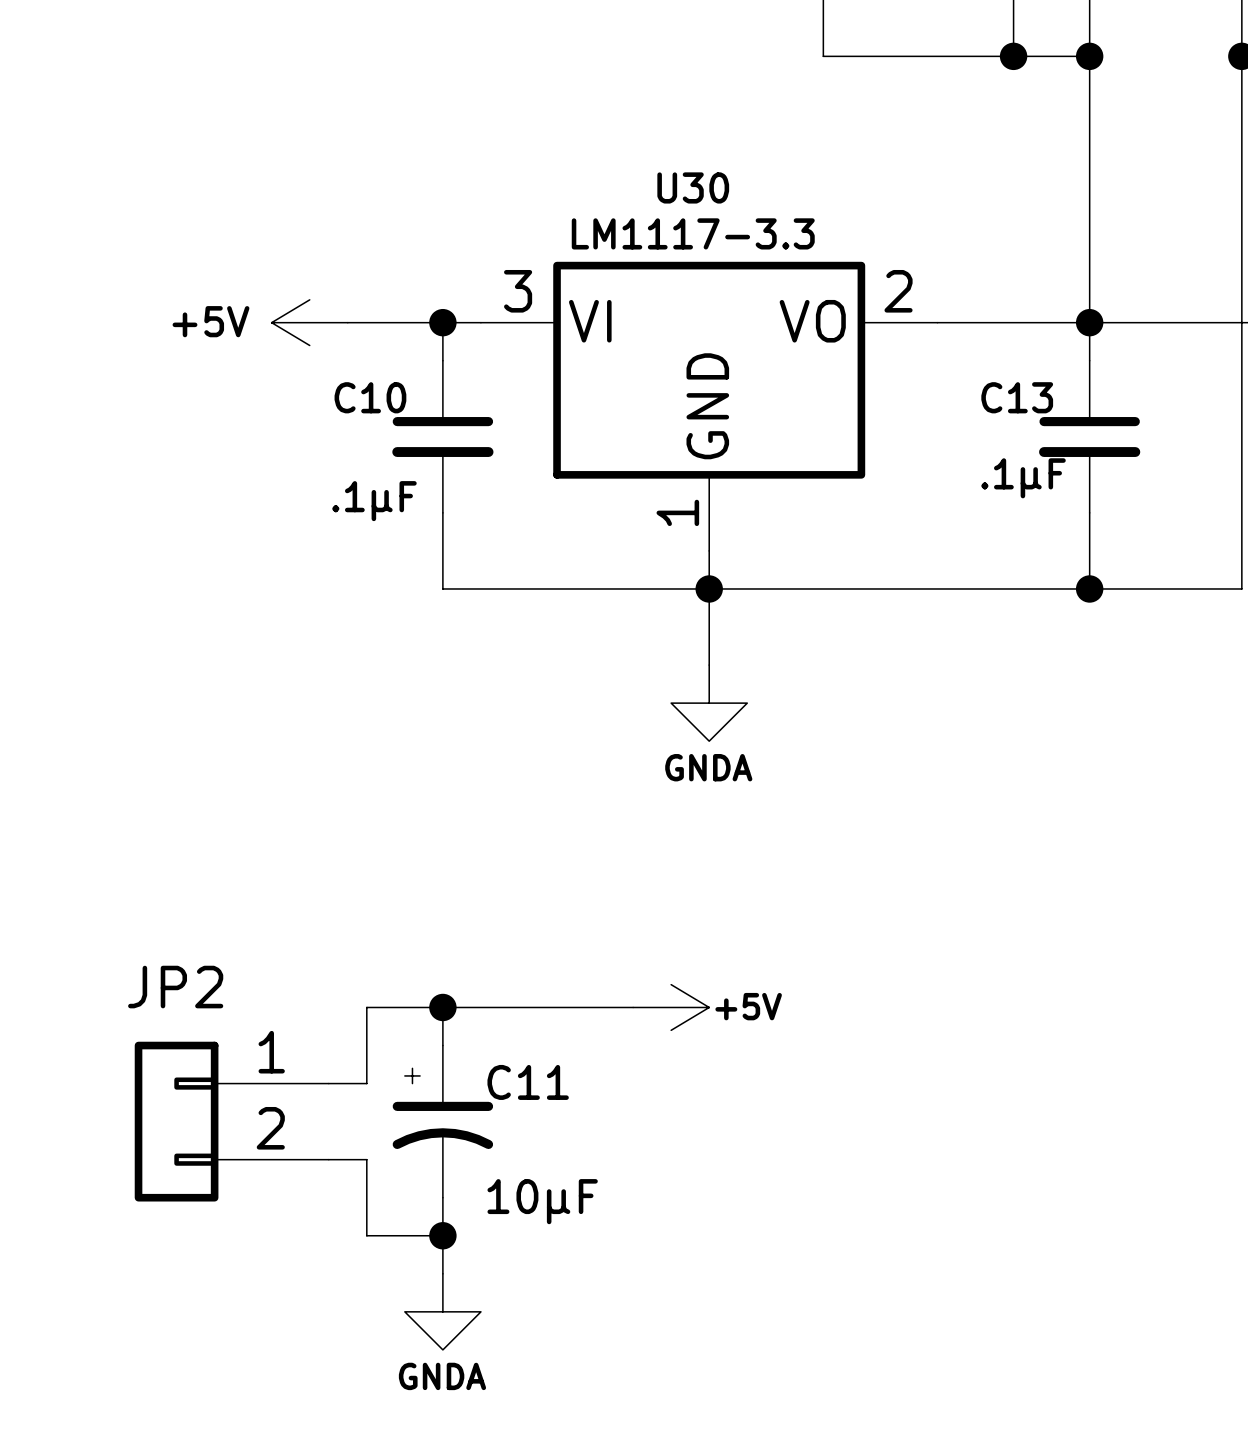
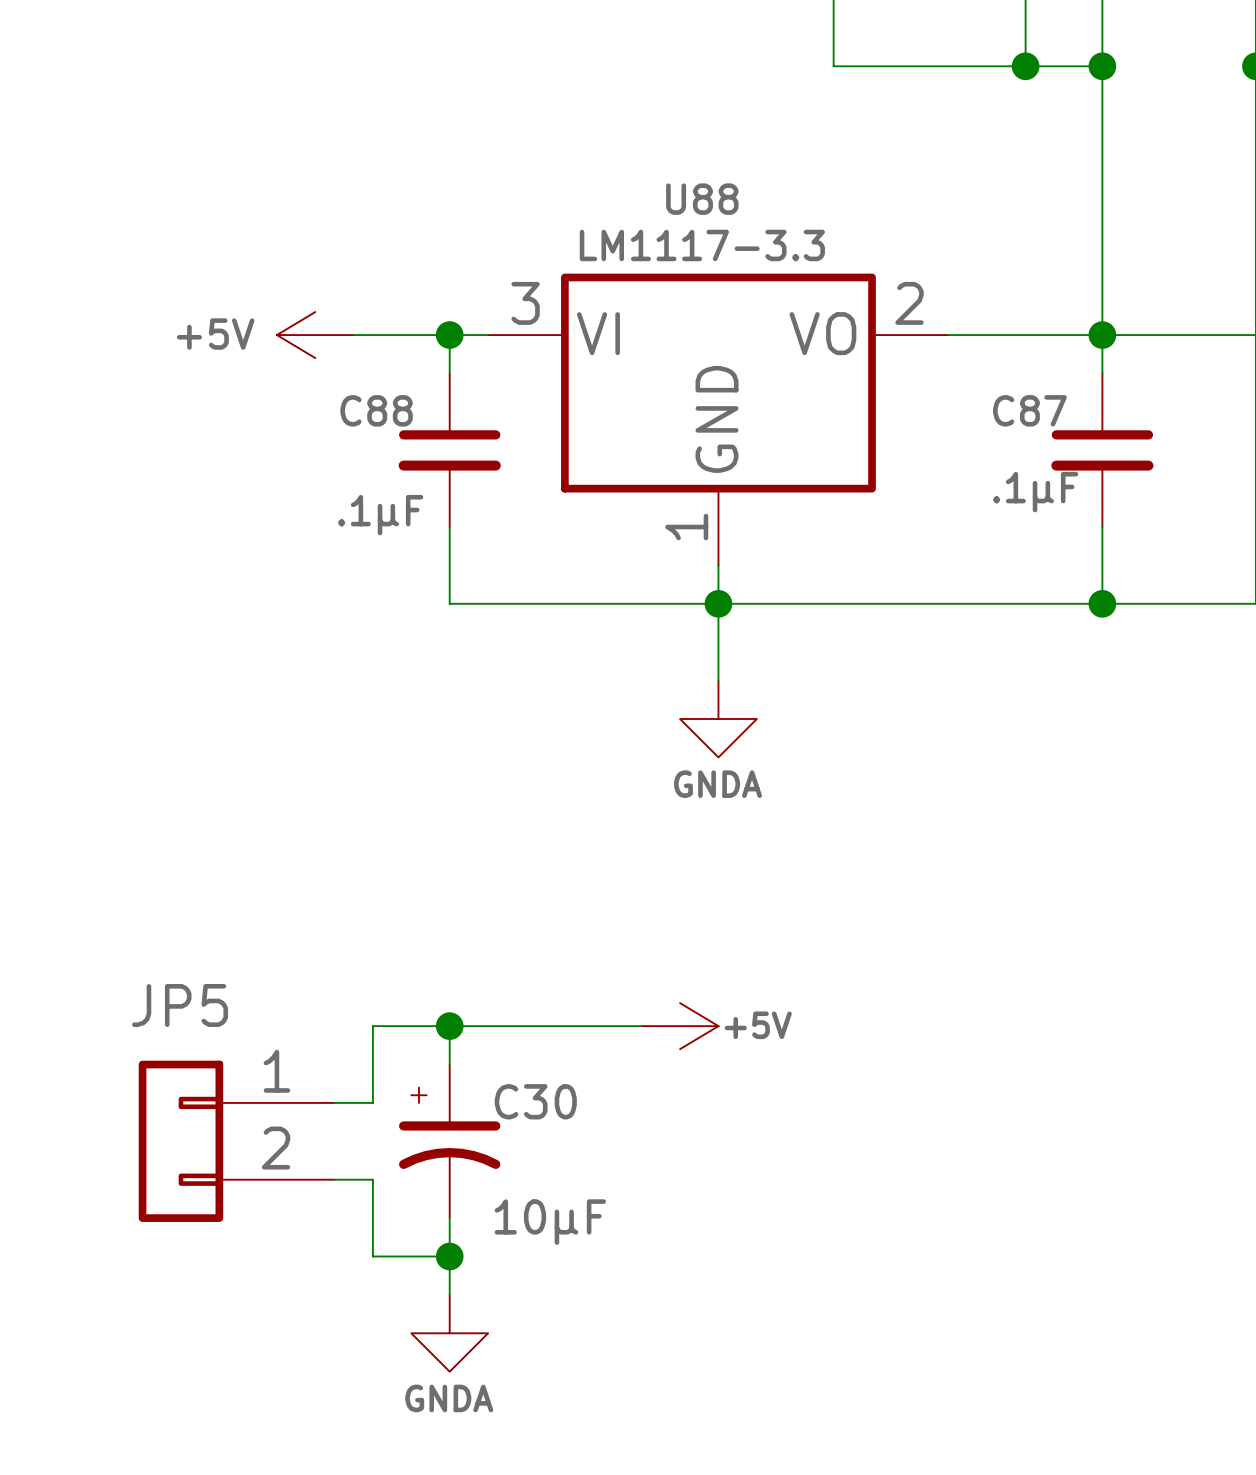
U30 name: U30 (693, 187) -> U88 (702, 199)
C10 name: C10 (370, 397) -> C88 (376, 410)
C13 name: C13 (1017, 397) -> C87 (1029, 410)
JP2 name: JP2 (175, 987) -> JP5 (180, 1005)
C11 name: C11 (528, 1082) -> C30 (535, 1101)

